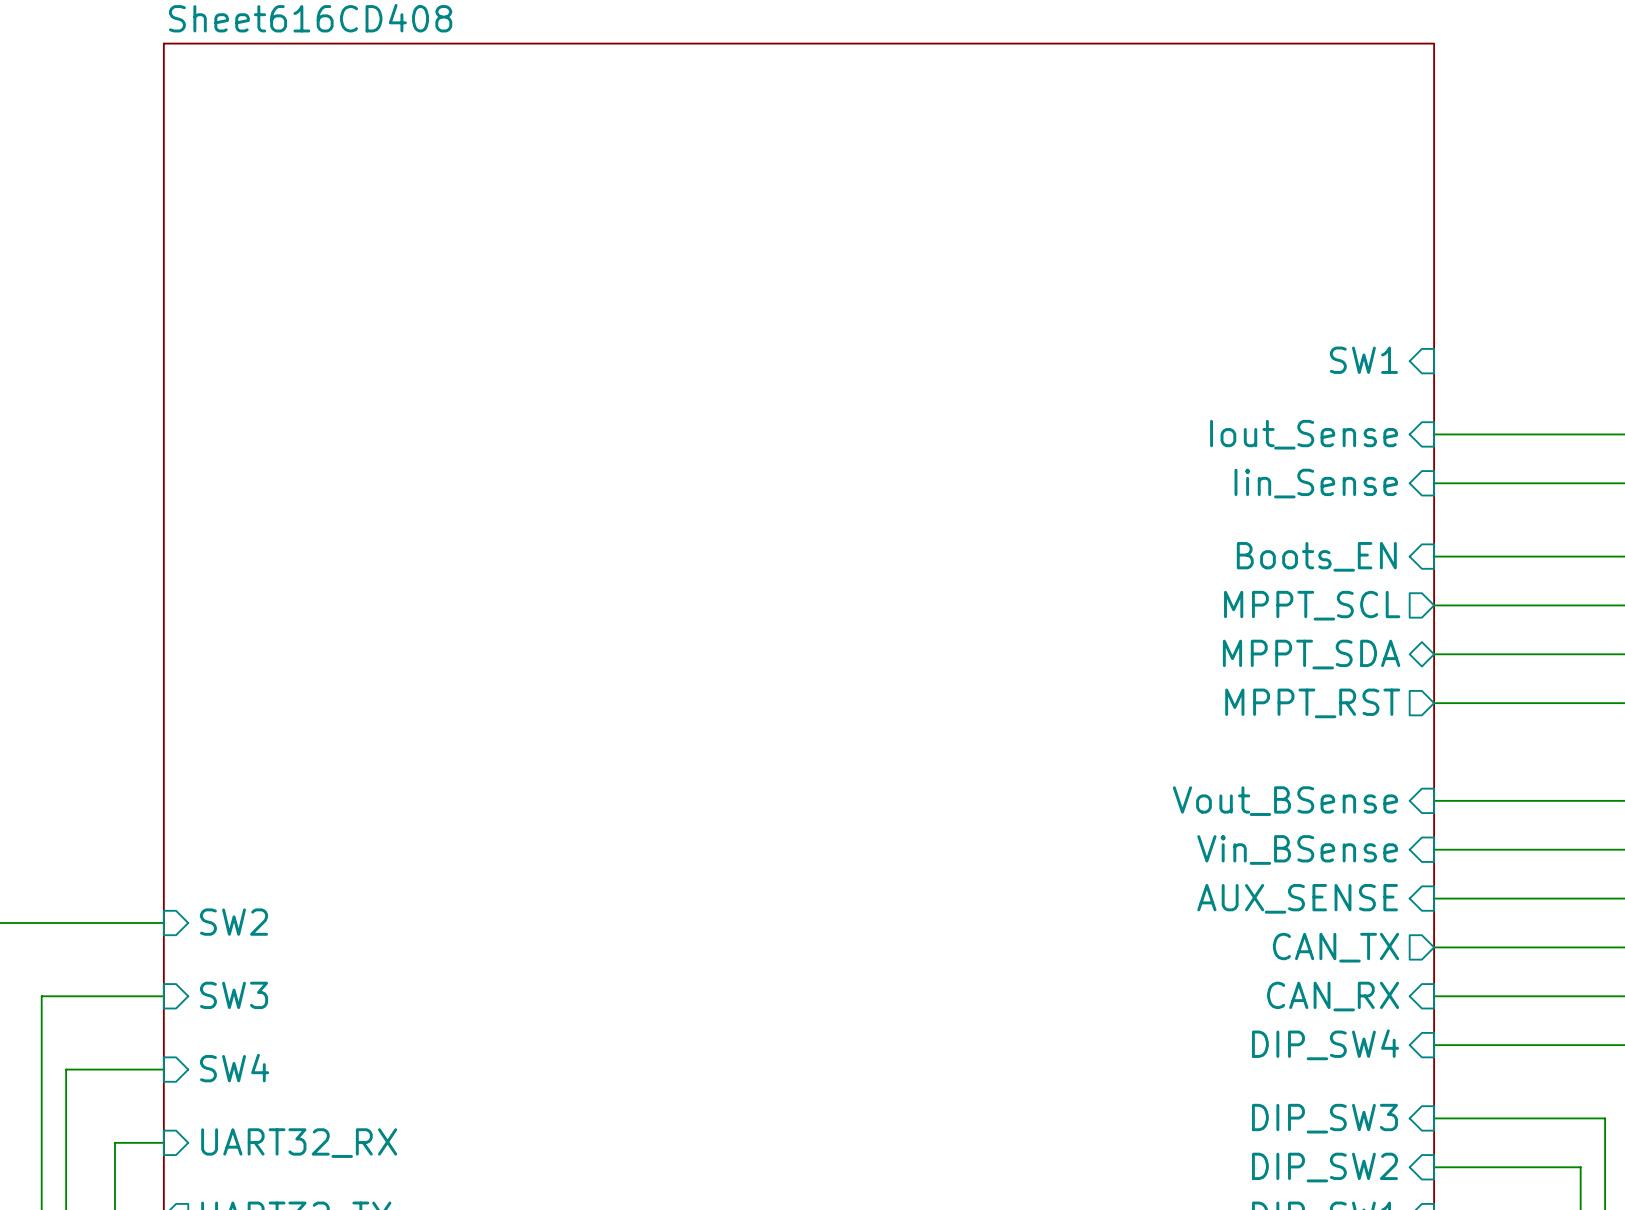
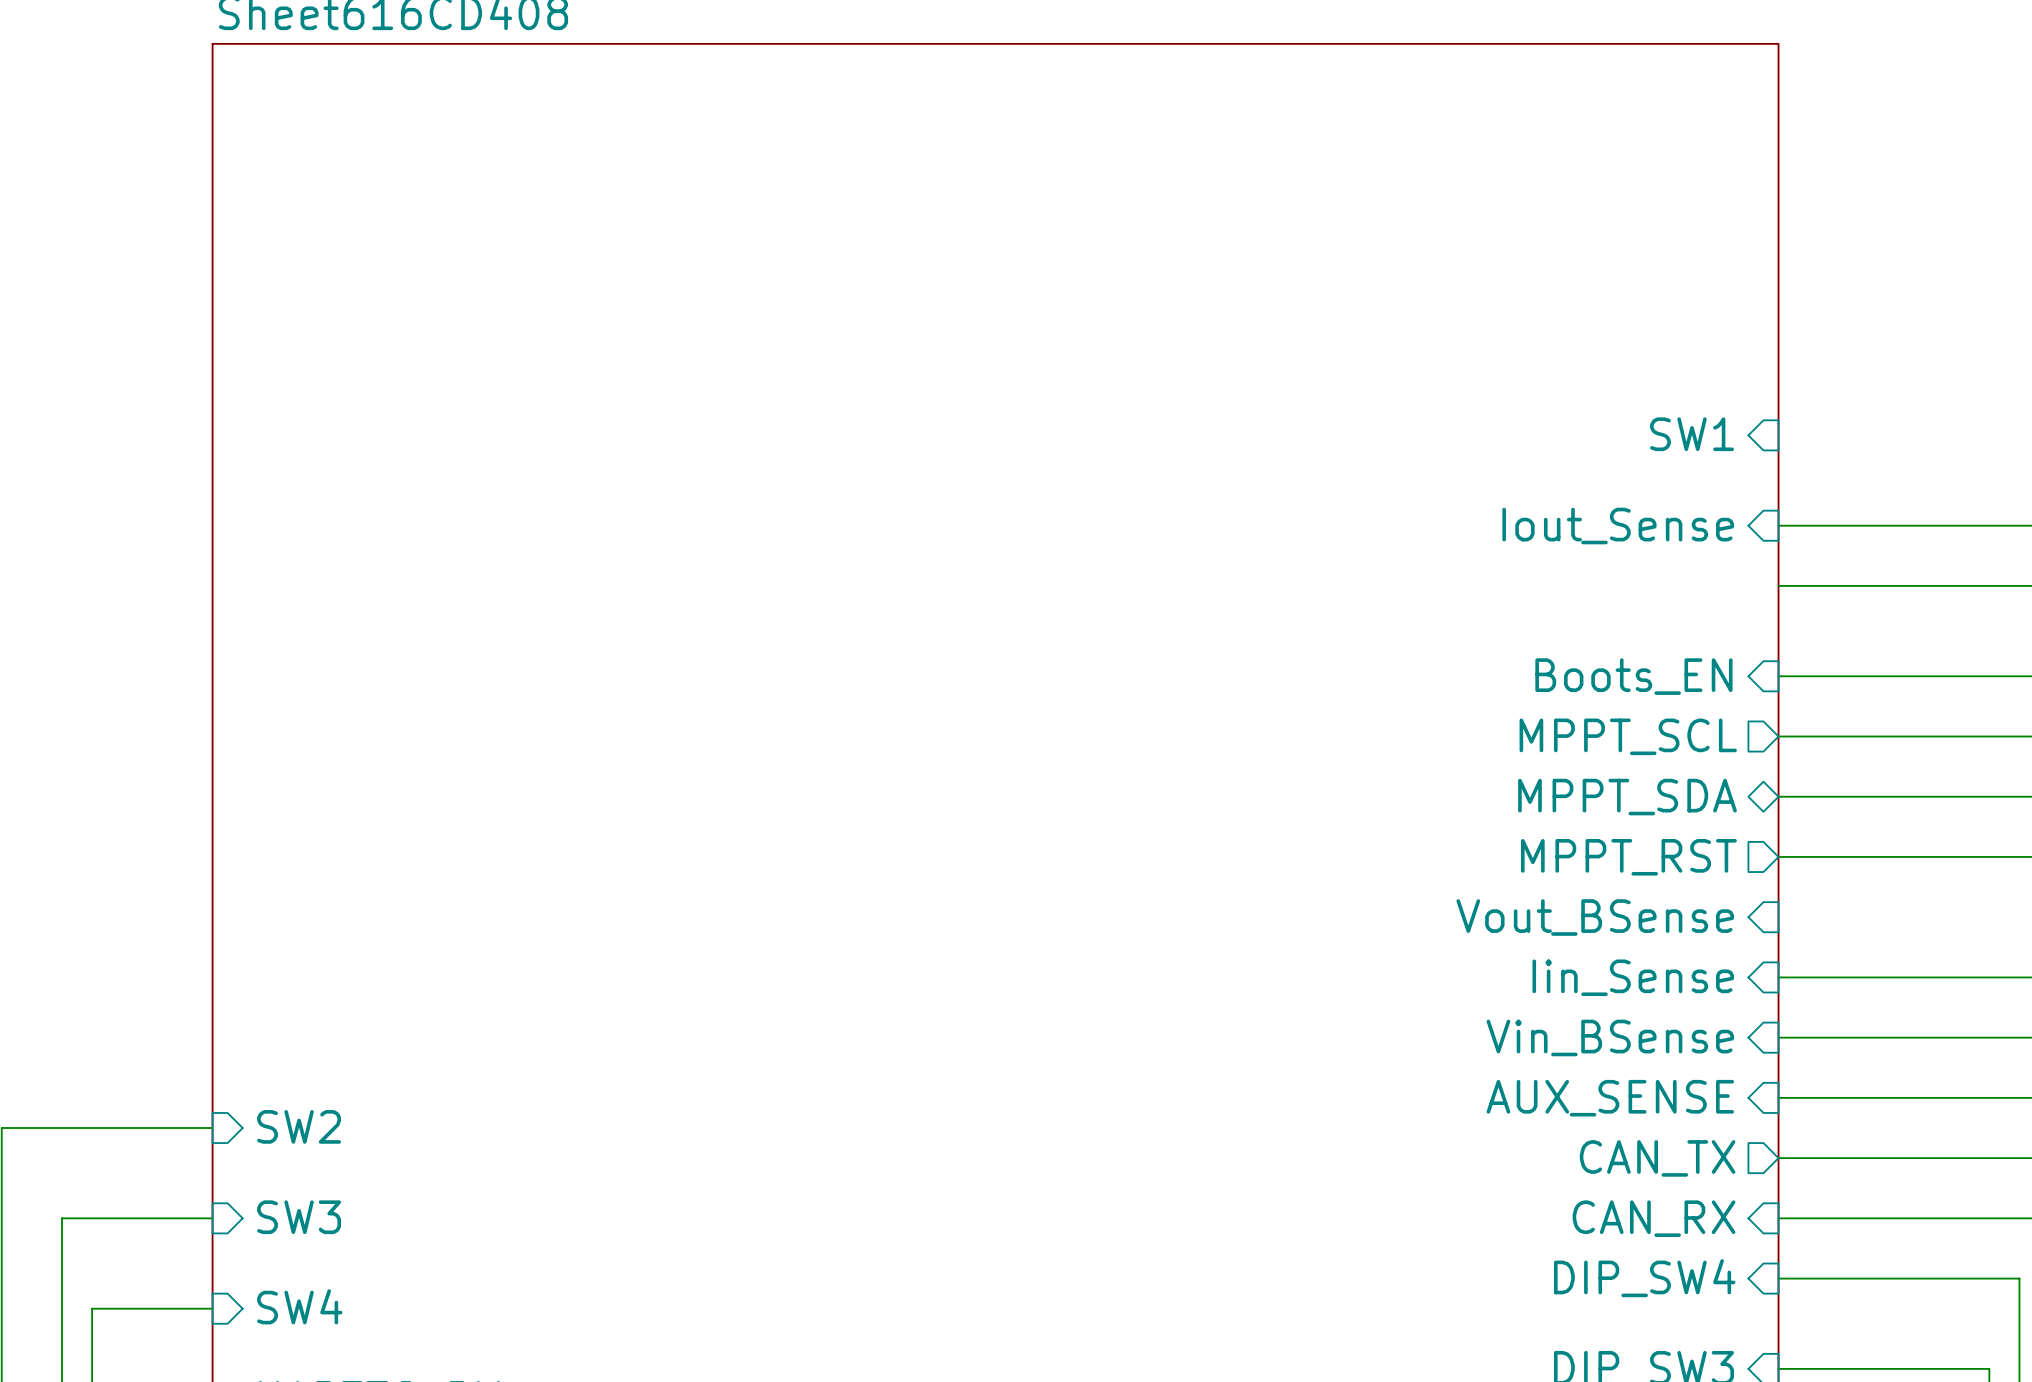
sheet pin: Iin_Sense (1316, 483) -> none
sheet pin: none -> Vout_BSense (1595, 917)
sheet pin: Vout_BSense (1285, 801) -> Iin_Sense (1633, 977)

